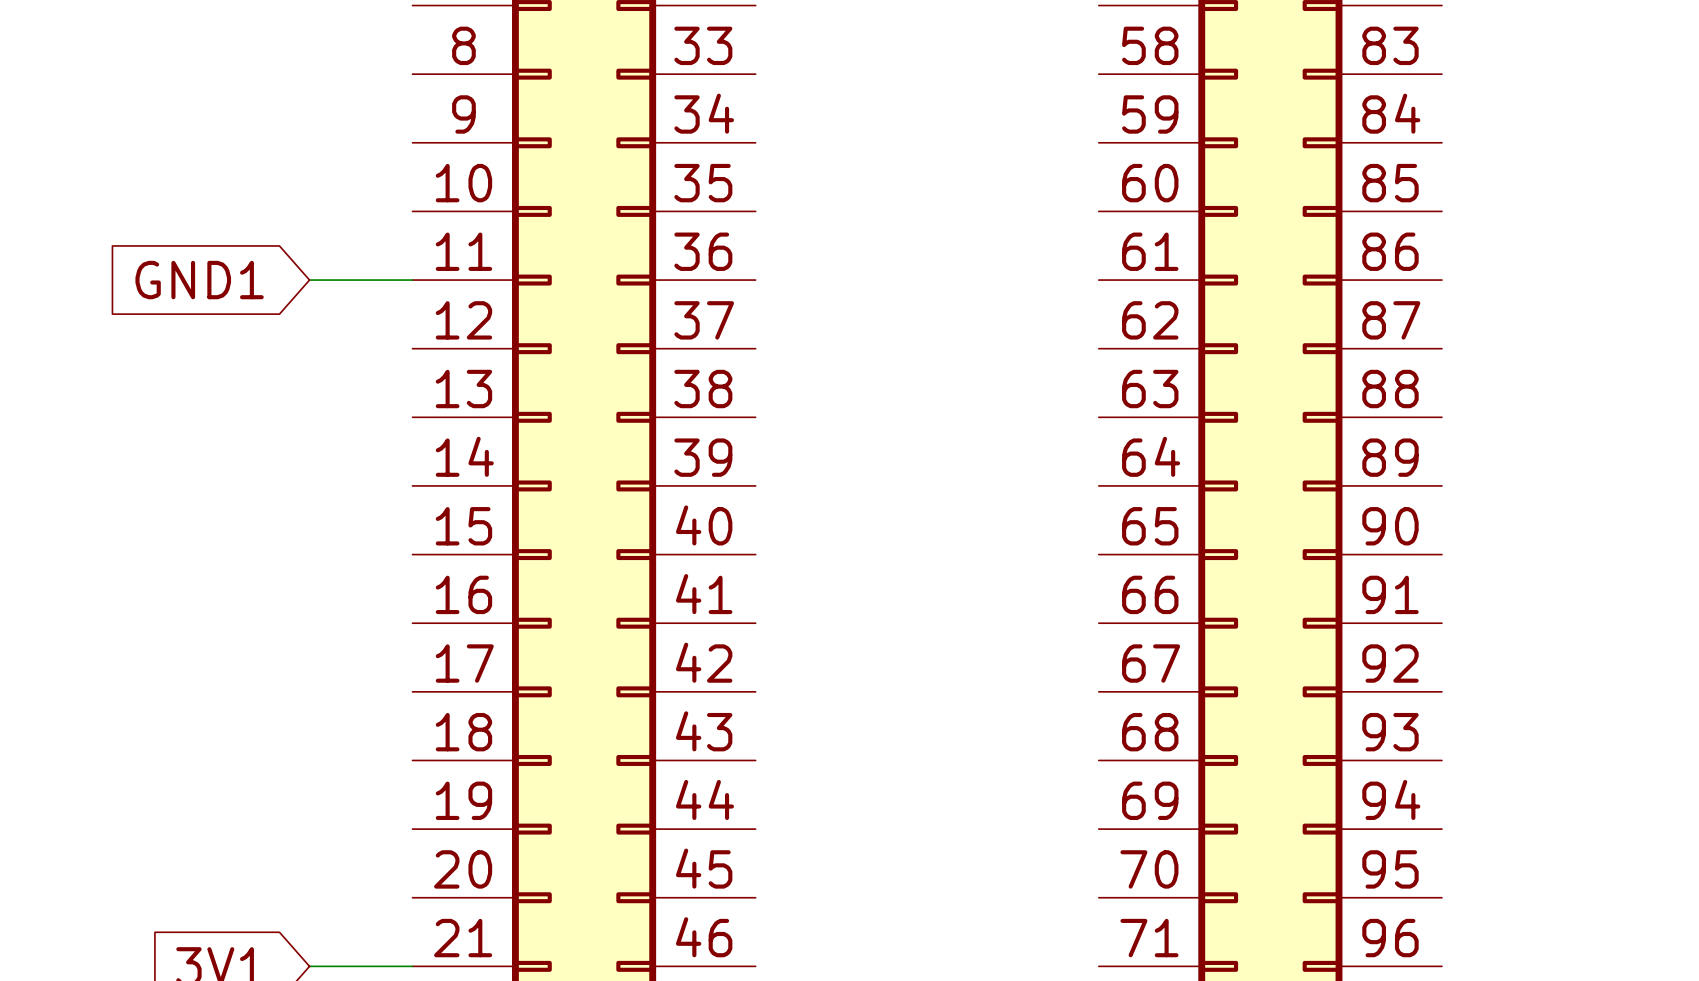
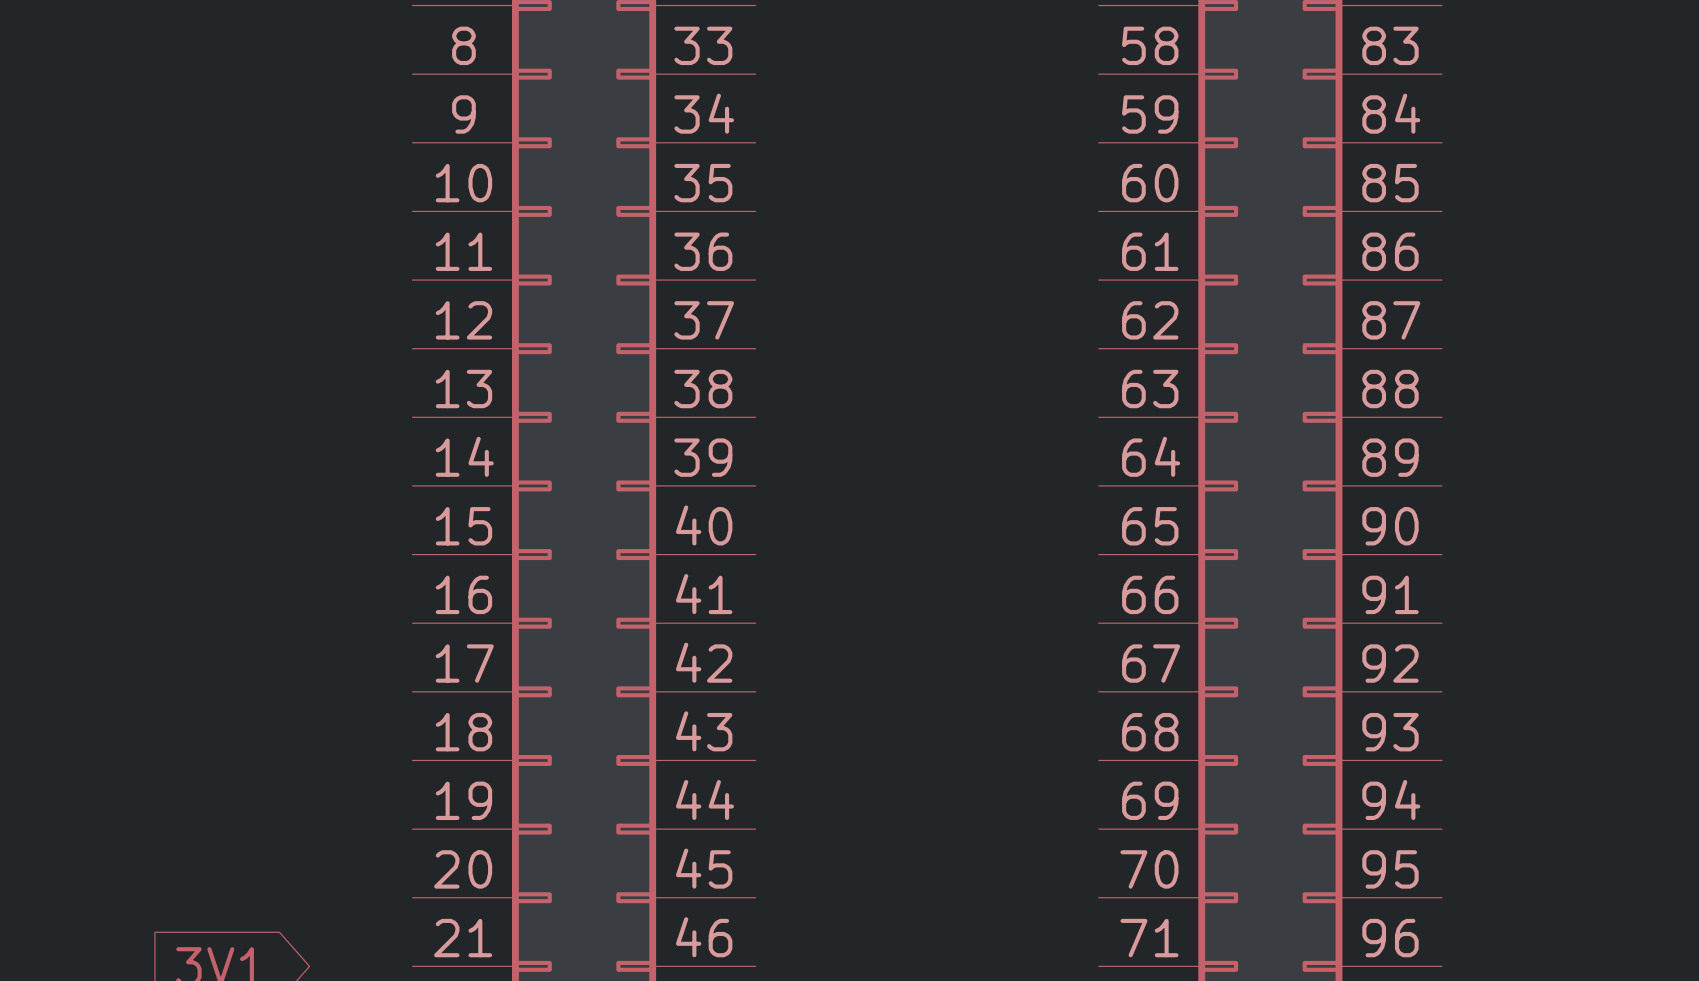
global label: GND1 (199, 280) -> none
wire: (309, 280) (412, 280) -> none
wire: (309, 966) (412, 966) -> none

